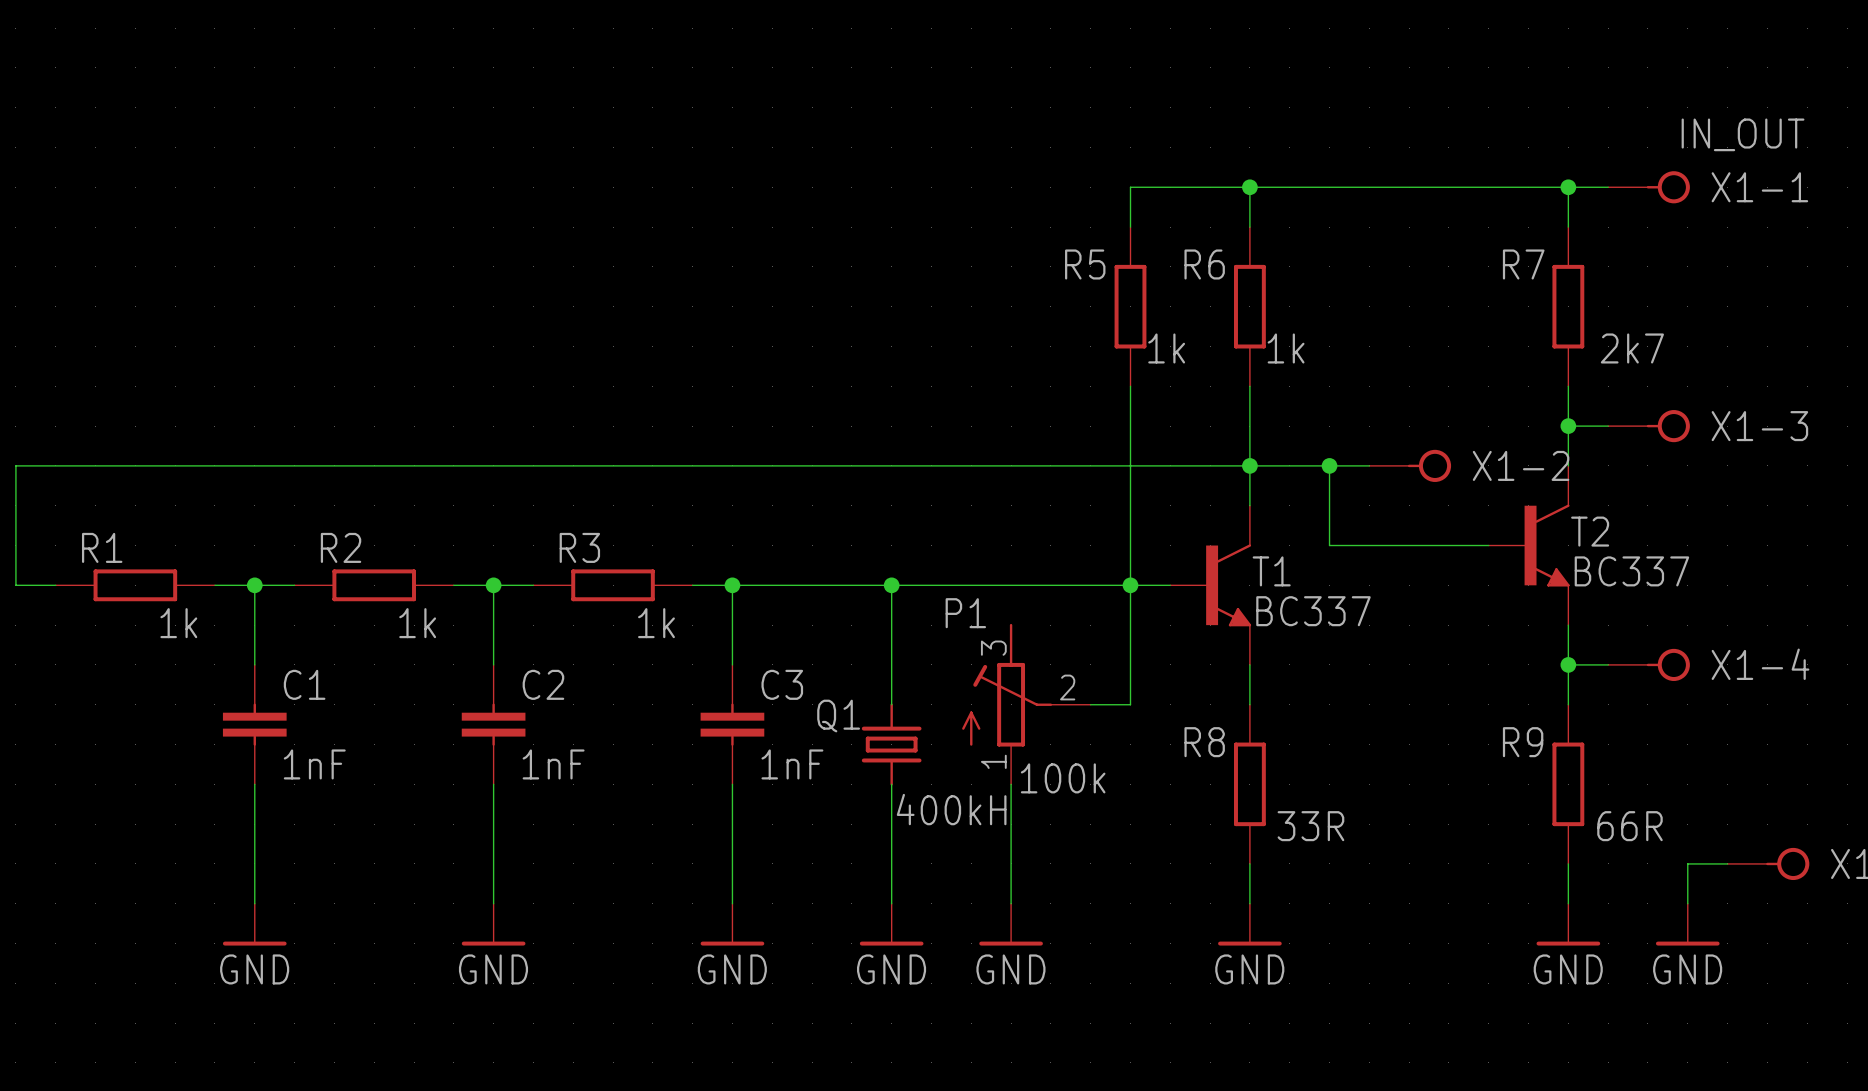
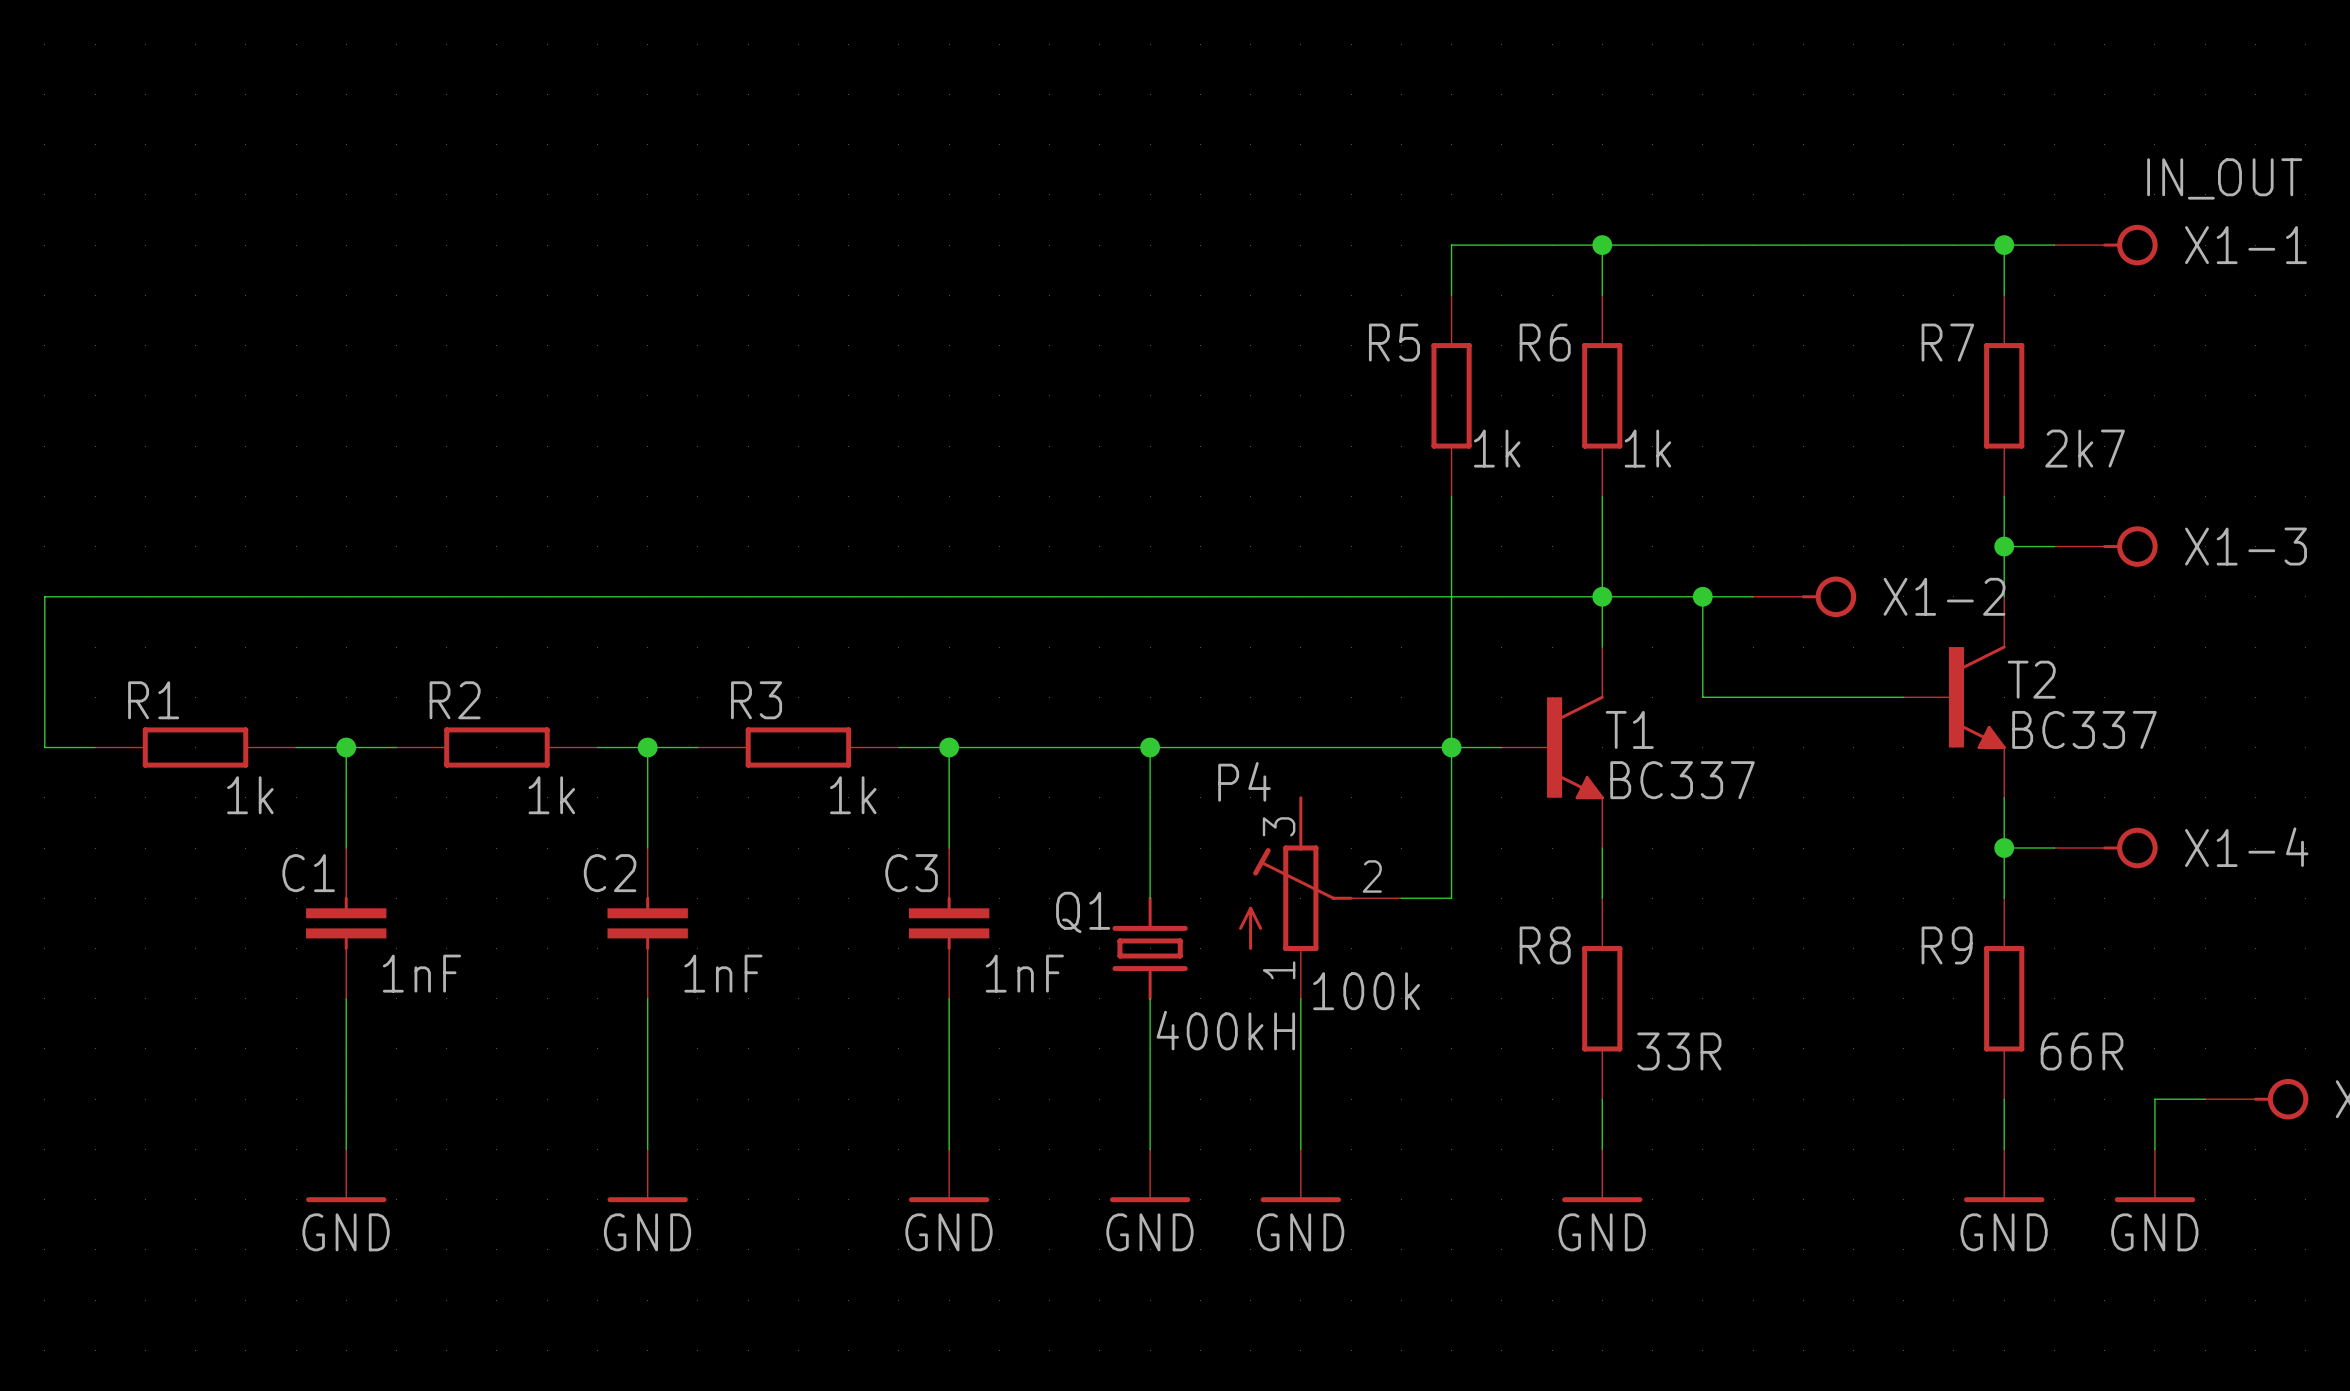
P1 name: P1 (965, 613) -> P4 (1244, 781)
C1 name position: C1 (304, 684) -> C1 (308, 873)
C2 name position: C2 (543, 684) -> C2 (610, 873)
C3 name position: C3 (782, 684) -> C3 (911, 873)

